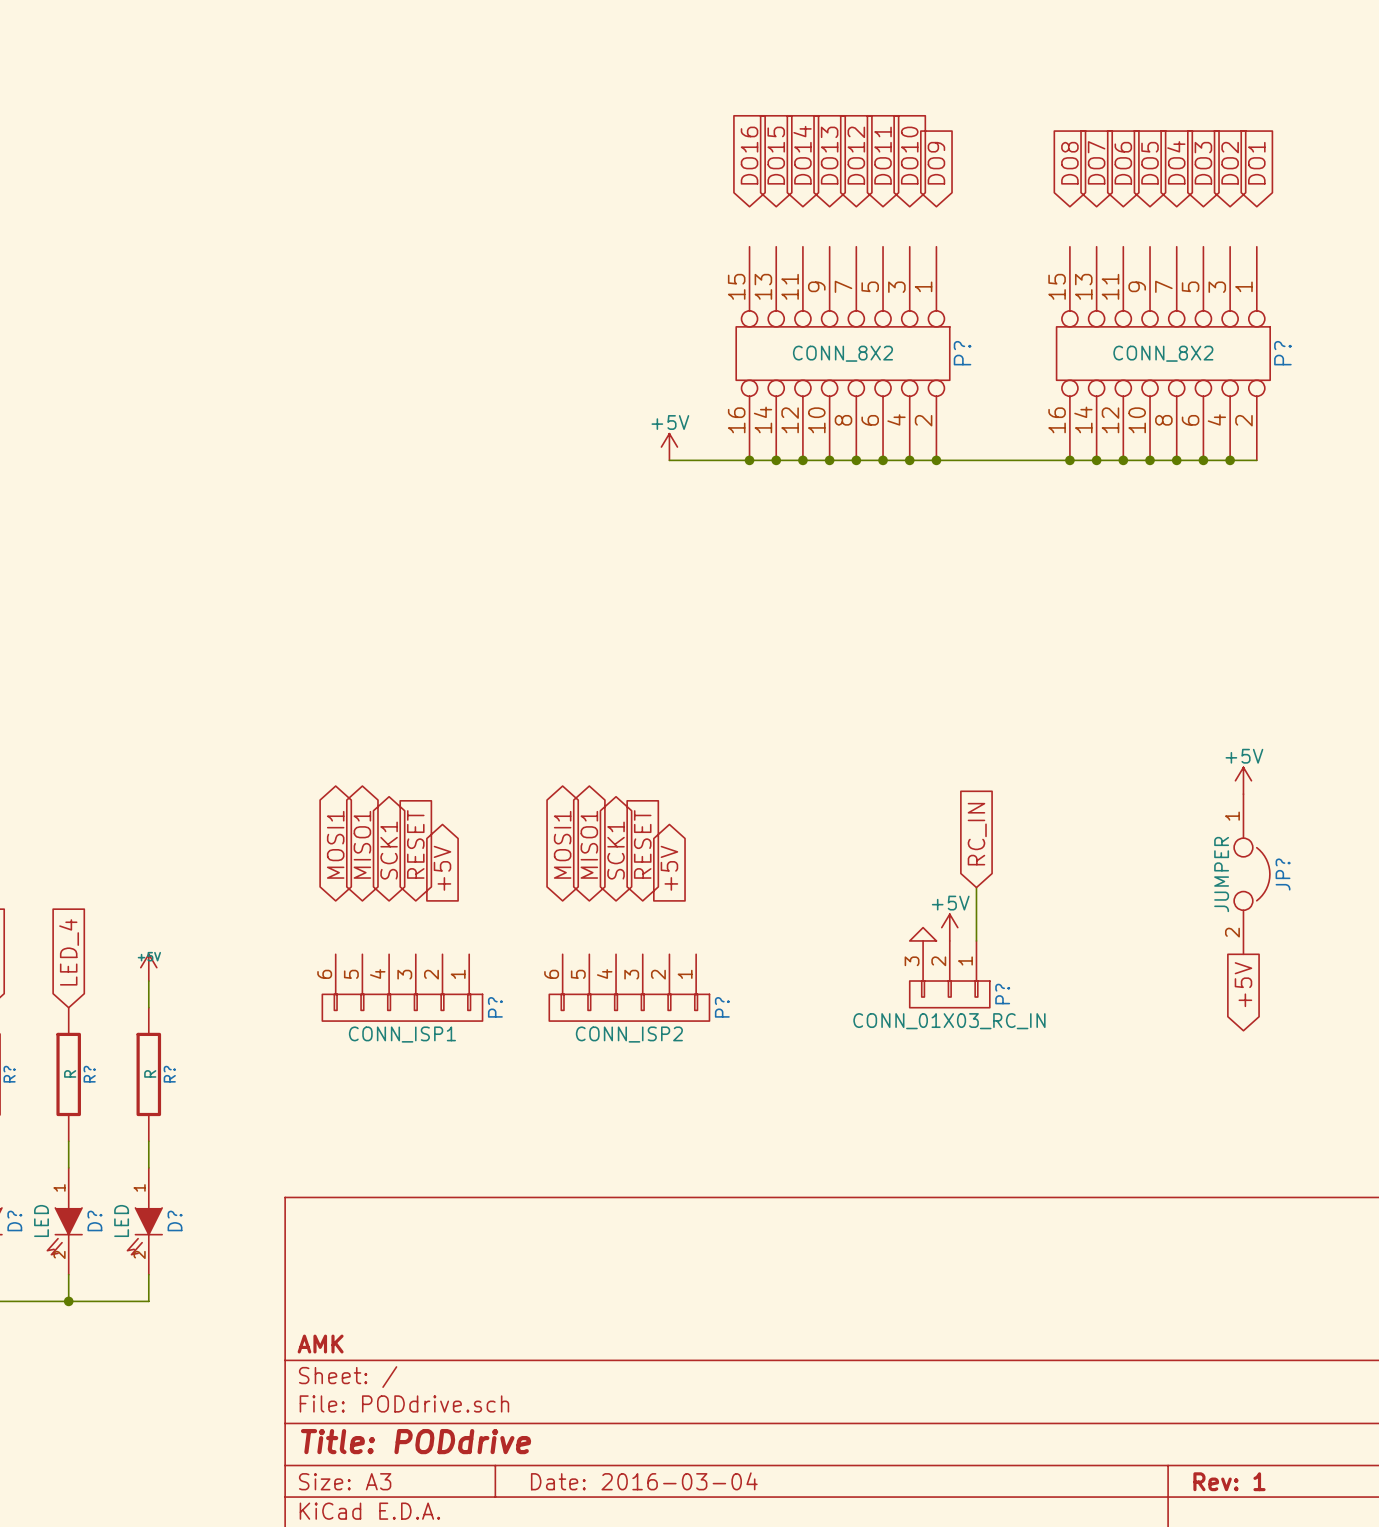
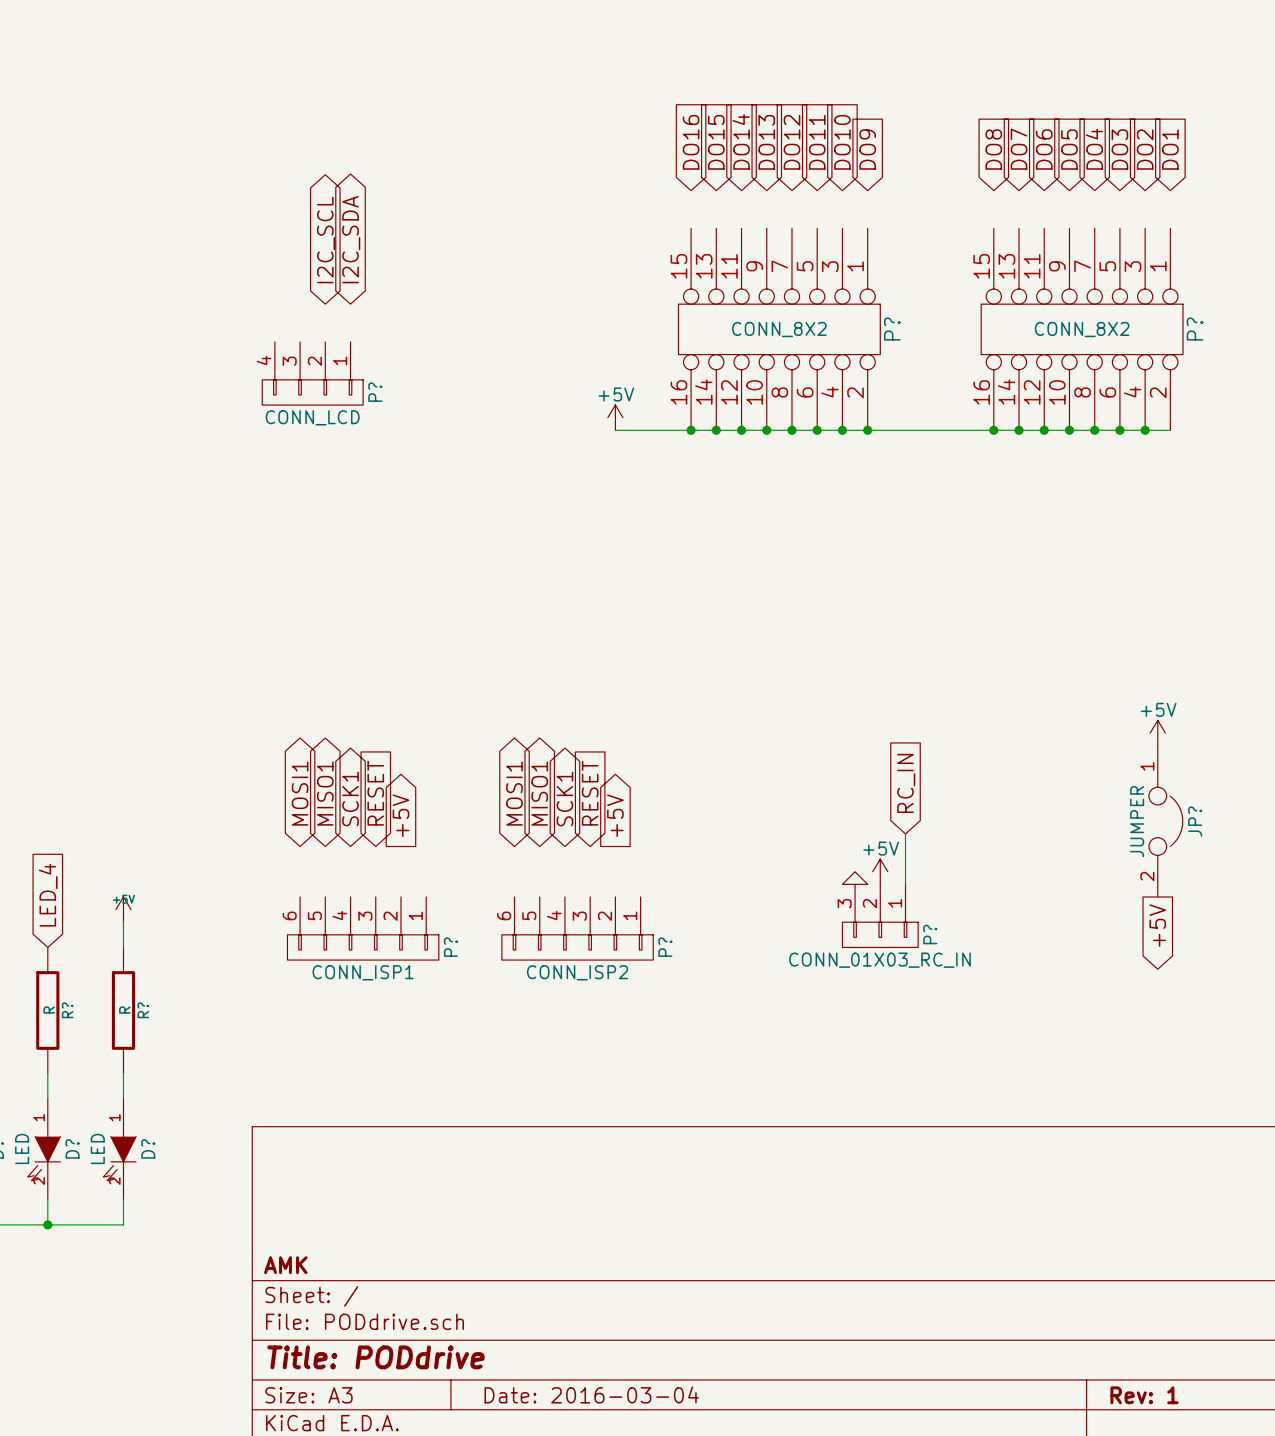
global label: none -> I2C_SCL (326, 240)
global label: none -> I2C_SDA (351, 239)
P?: none -> CONN_LCD (312, 373)

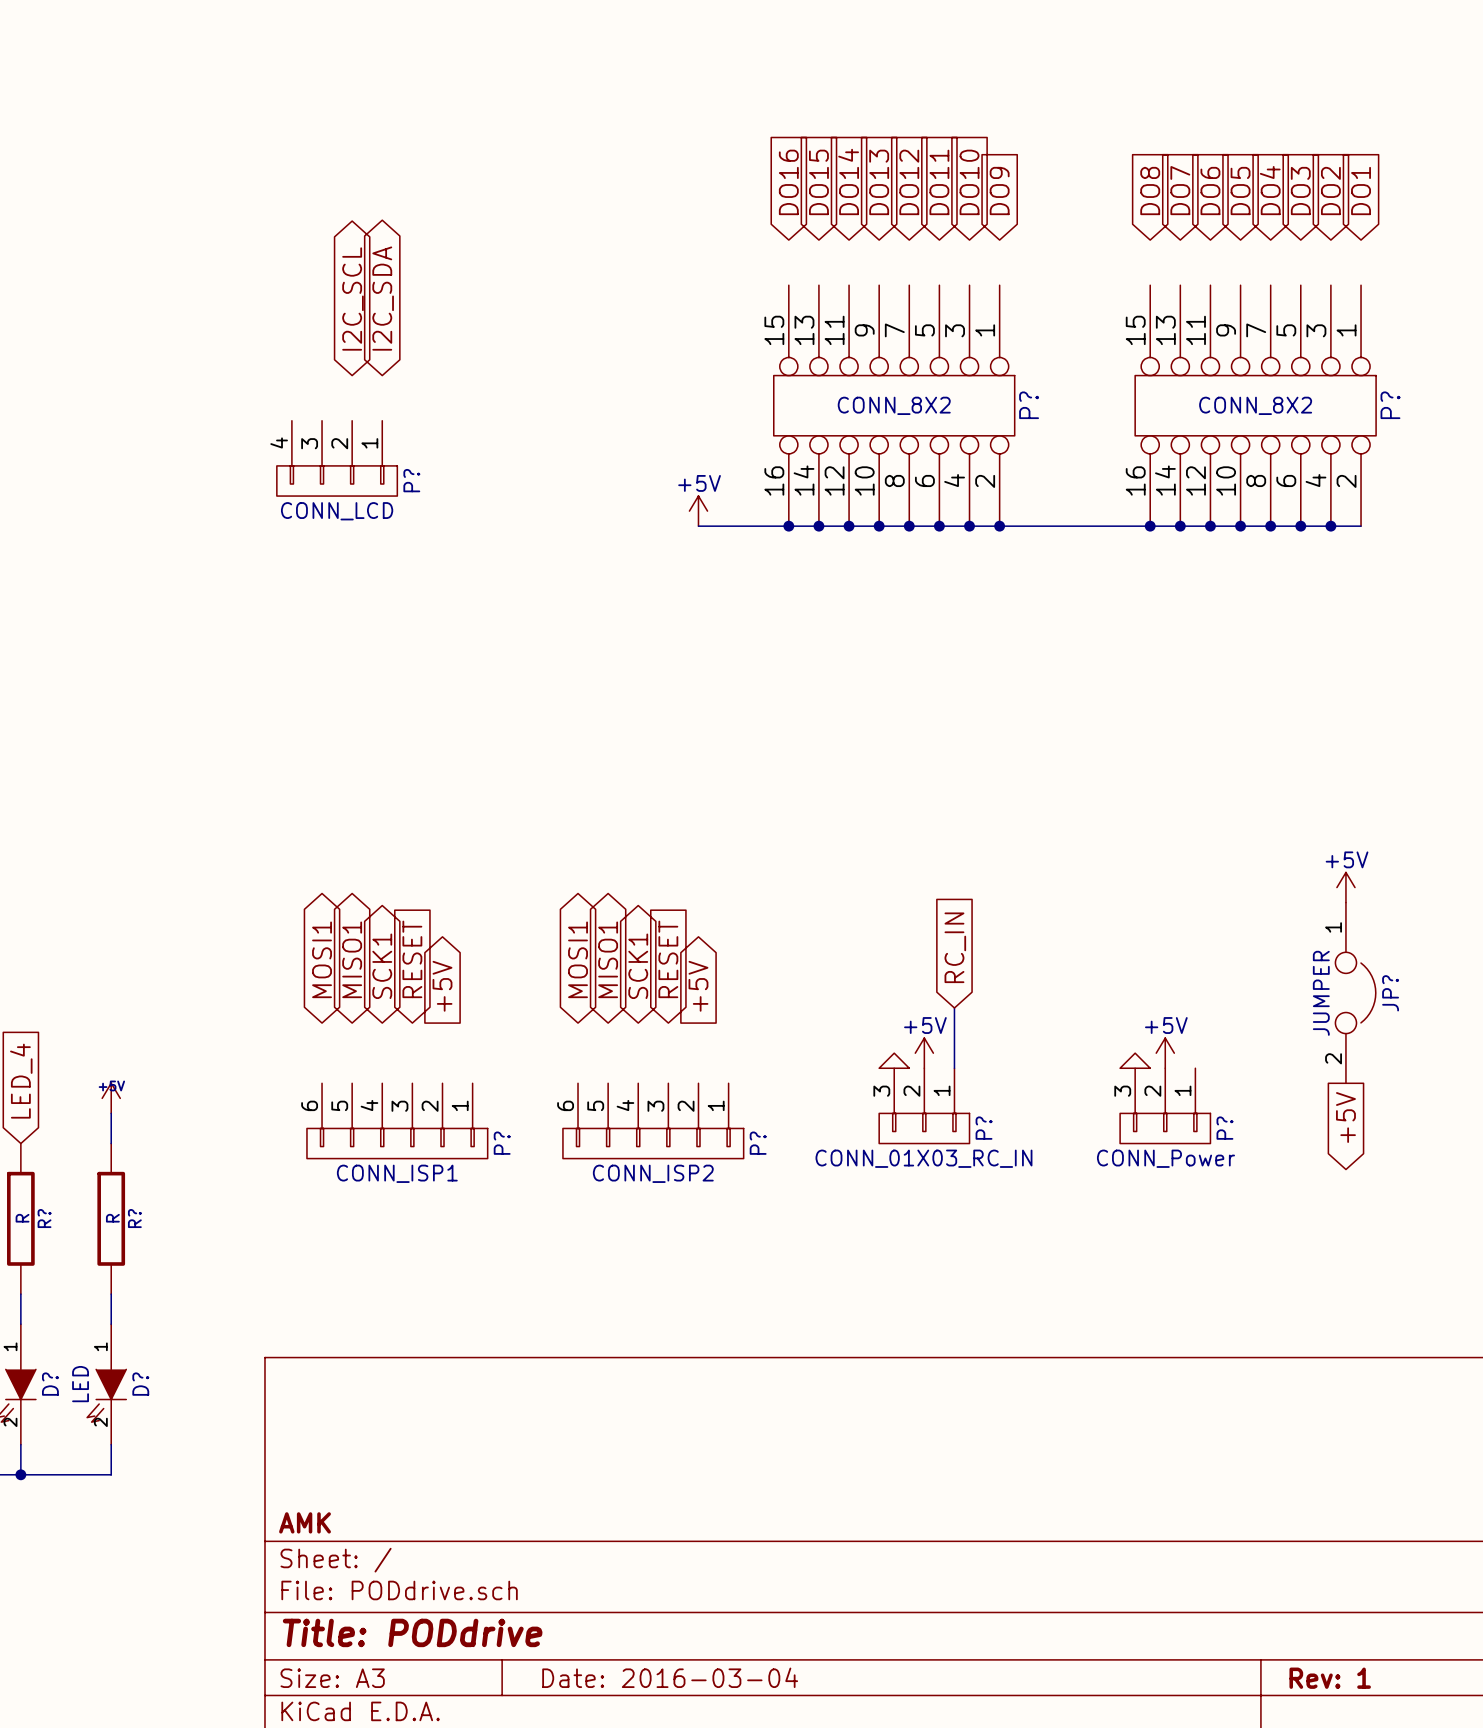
global label position: RC_IN (906, 783) -> RC_IN (955, 947)
wire: (905, 833) (905, 884) -> (954, 1008) (954, 1068)
power symbol: none -> +5V (924, 1053)
power symbol: +5V (880, 871) -> none
power symbol: none -> +5V (1165, 1053)
power symbol: none -> (894, 1060)
power symbol: (855, 878) -> none
power symbol: none -> (1135, 1060)
P? position: (880, 915) -> (924, 1105)
P?: none -> CONN_Power (1165, 1105)

